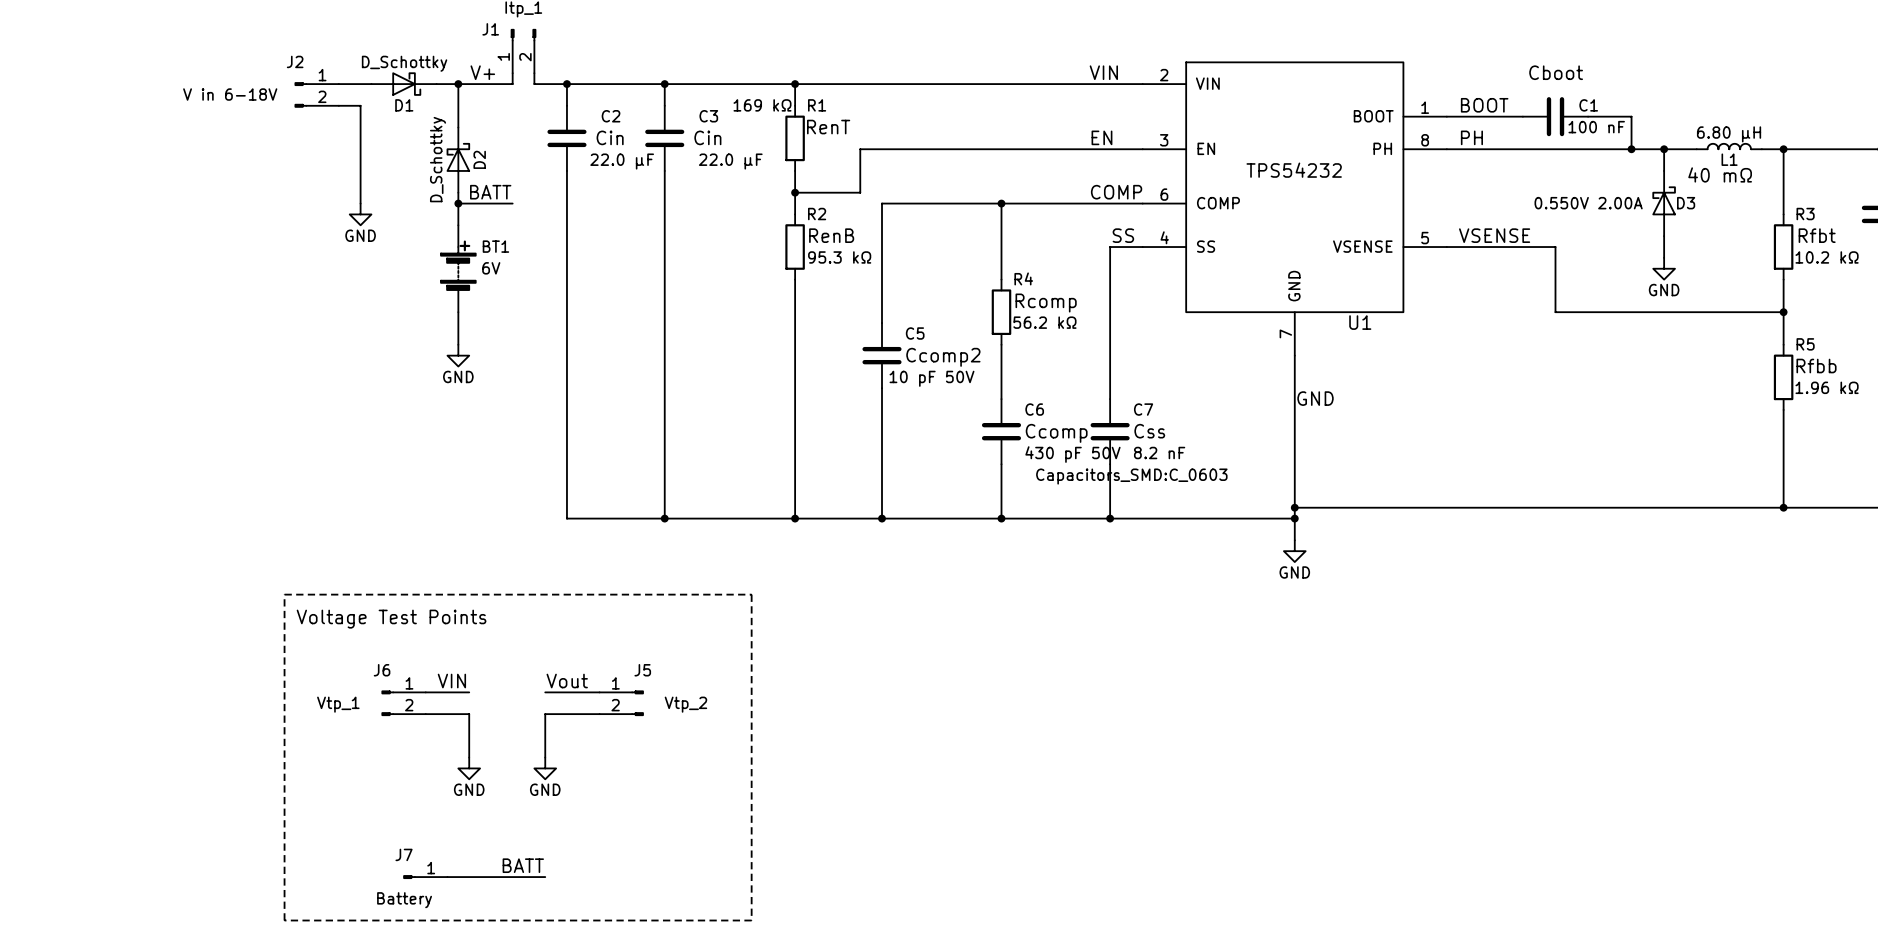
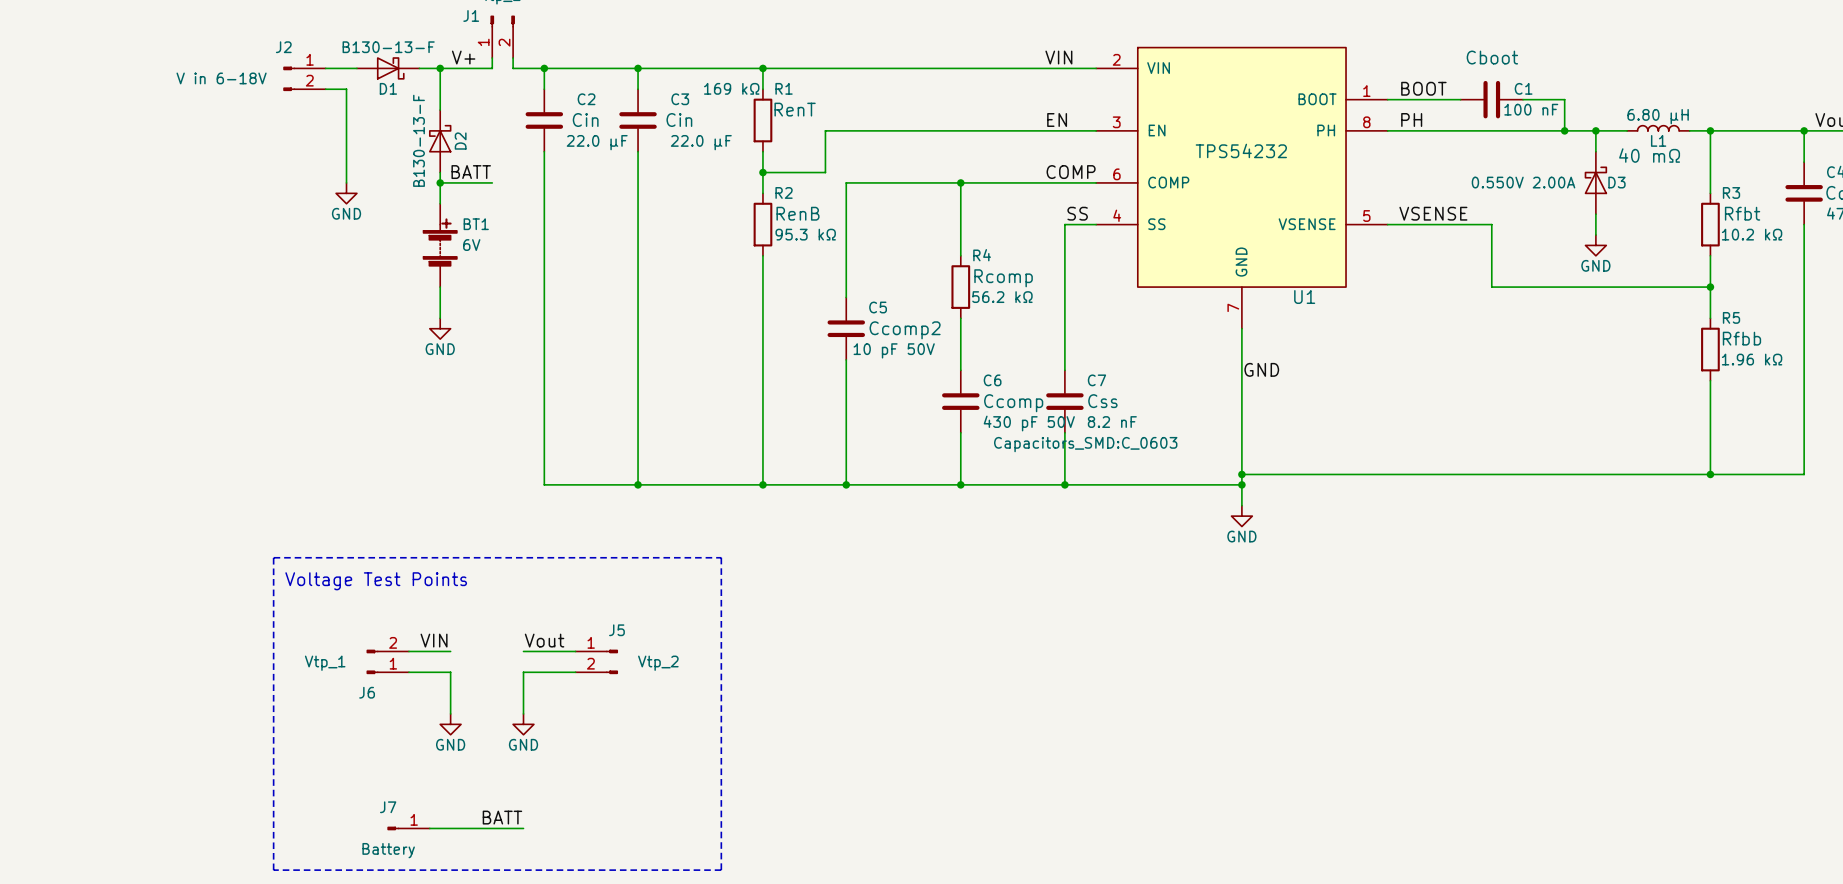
D1 value: D_Schottky (404, 63) -> B130-13-F (388, 47)
D2 value: D_Schottky (438, 159) -> B130-13-F (419, 140)
J6 flip: as is (387, 703) -> up-down (372, 661)

